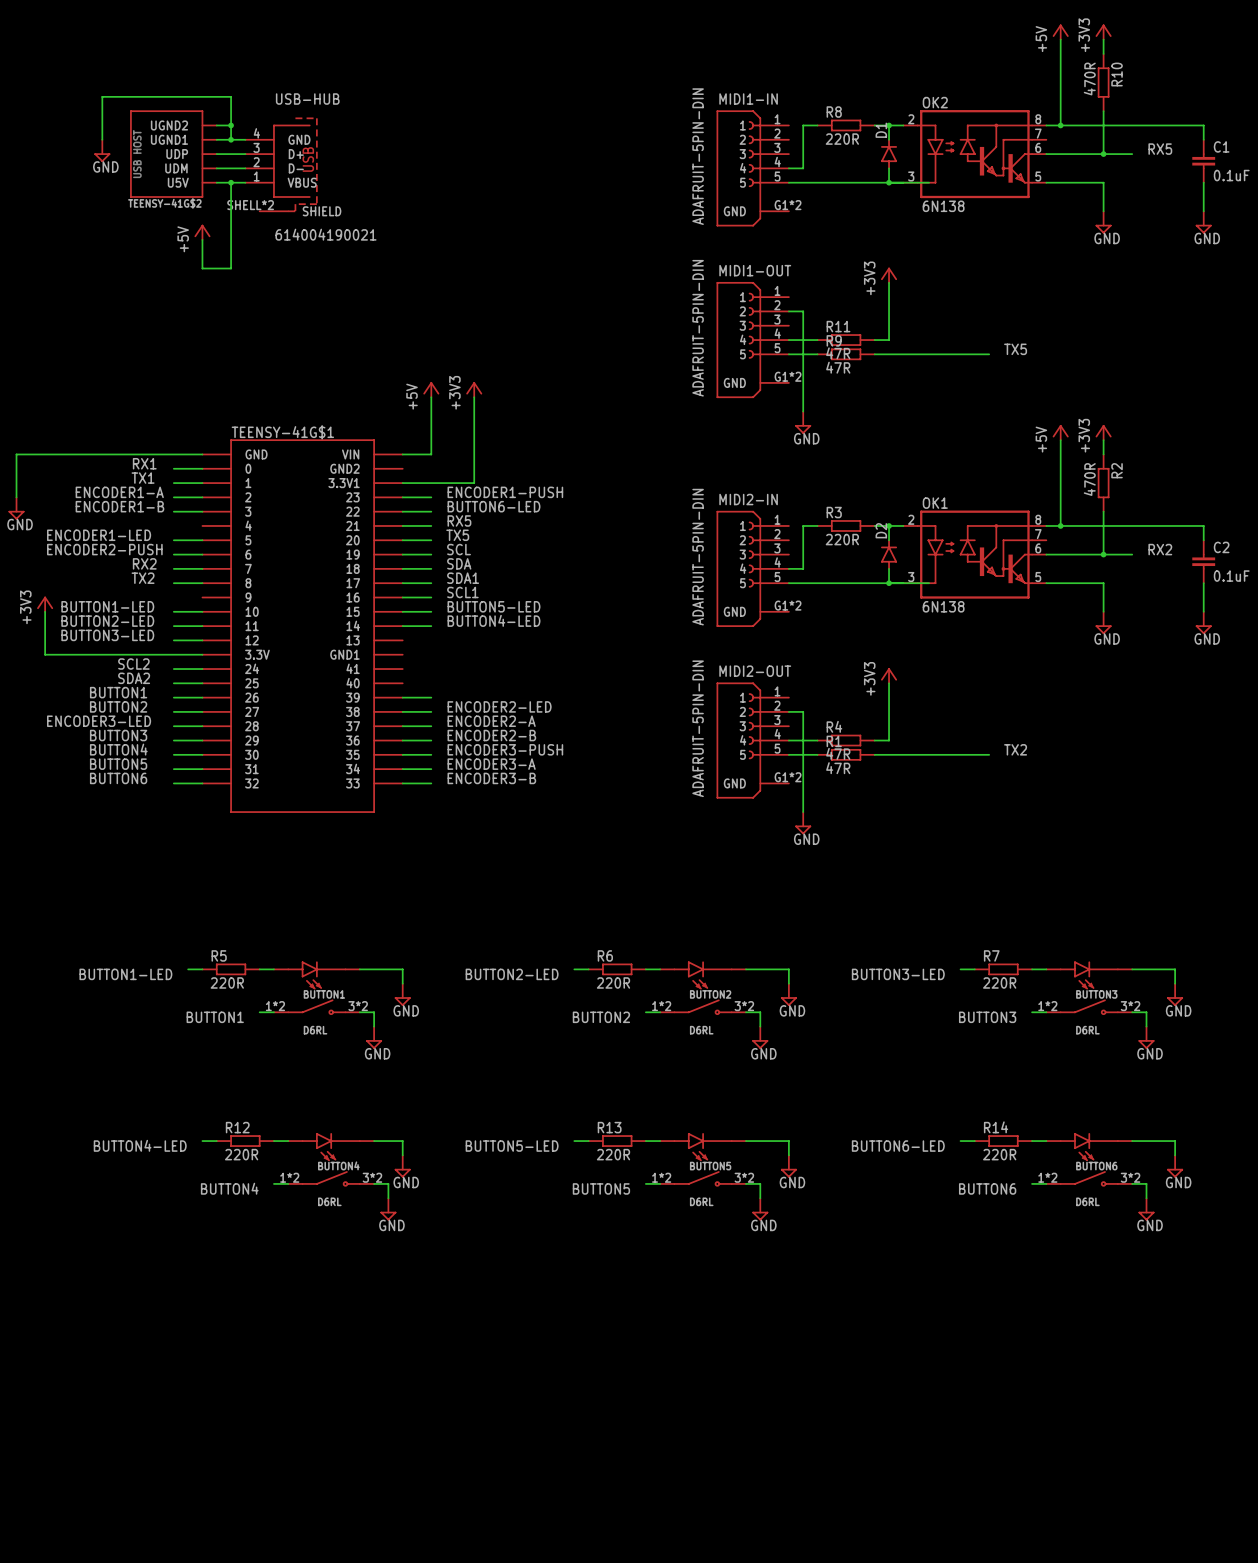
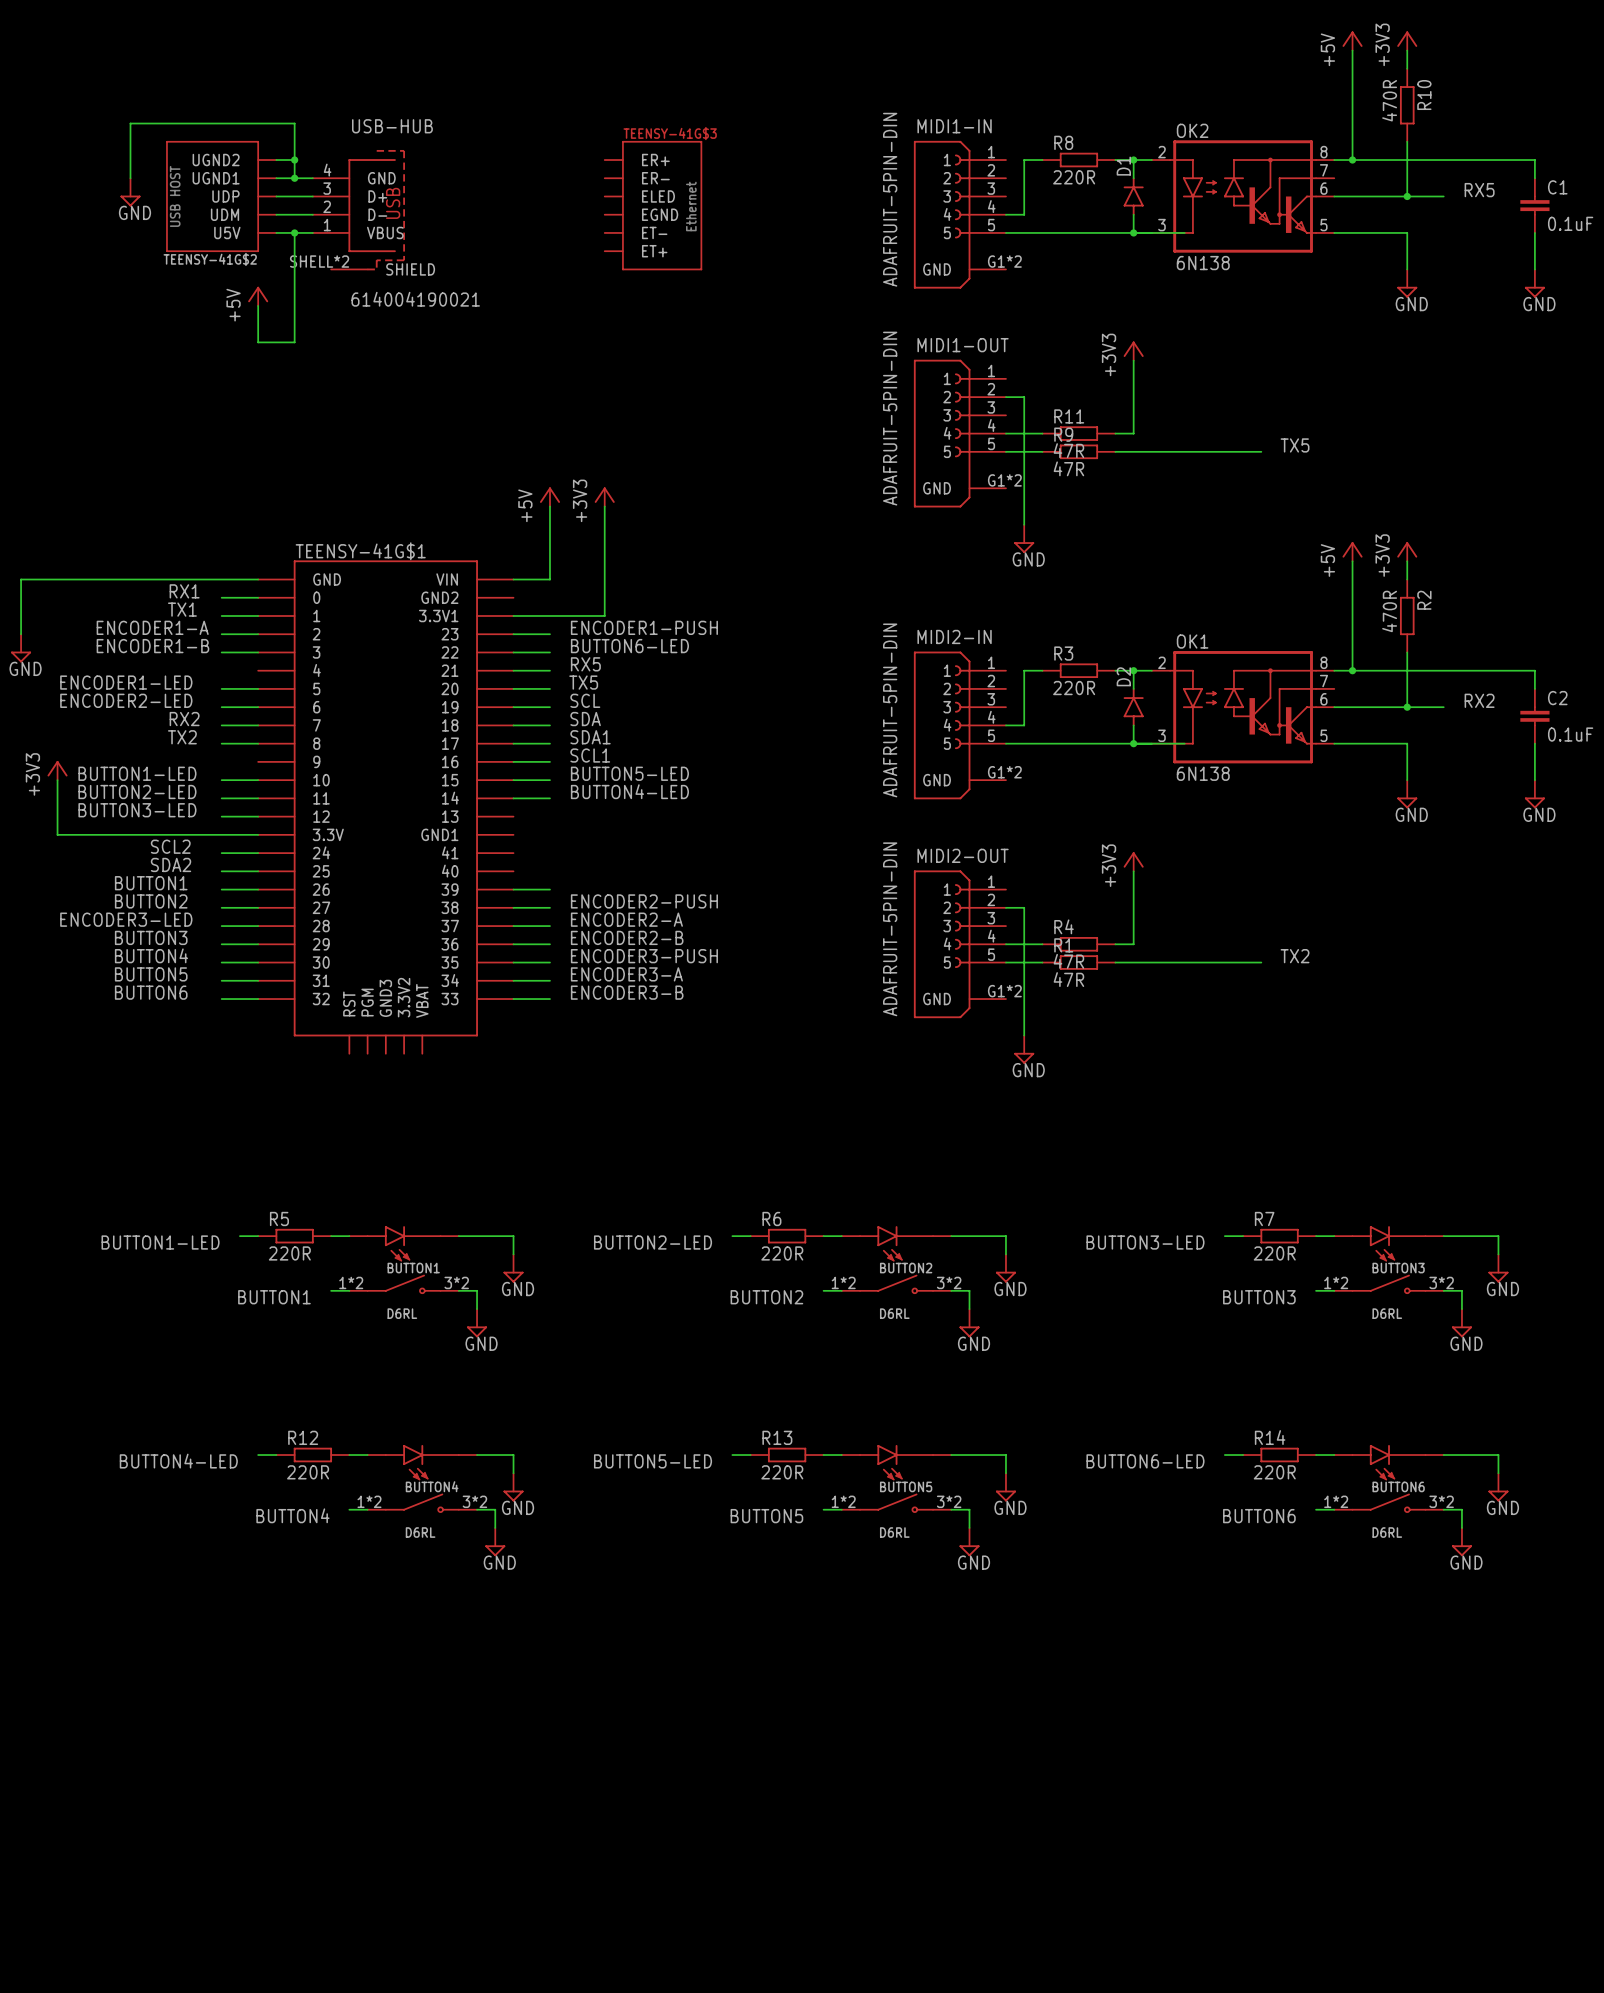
TEENSY-41G$3: none -> (653, 205)
TEENSY-41G$1 symbol: [202, 439, 403, 813] -> [258, 560, 514, 1054]
label: ENCODER2-PUSH (104, 549) -> ENCODER2-LED (126, 700)
label: ENCODER2-LED (499, 706) -> ENCODER2-PUSH (644, 901)

